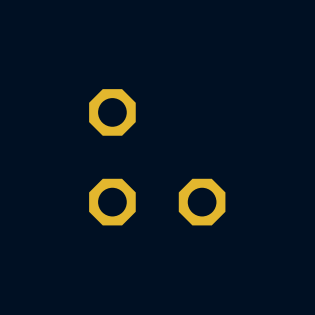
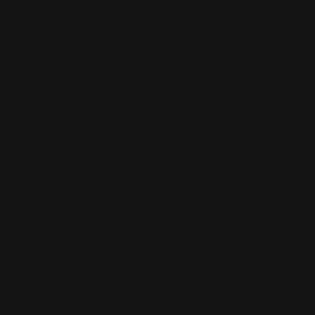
part: (157, 157) -> none

